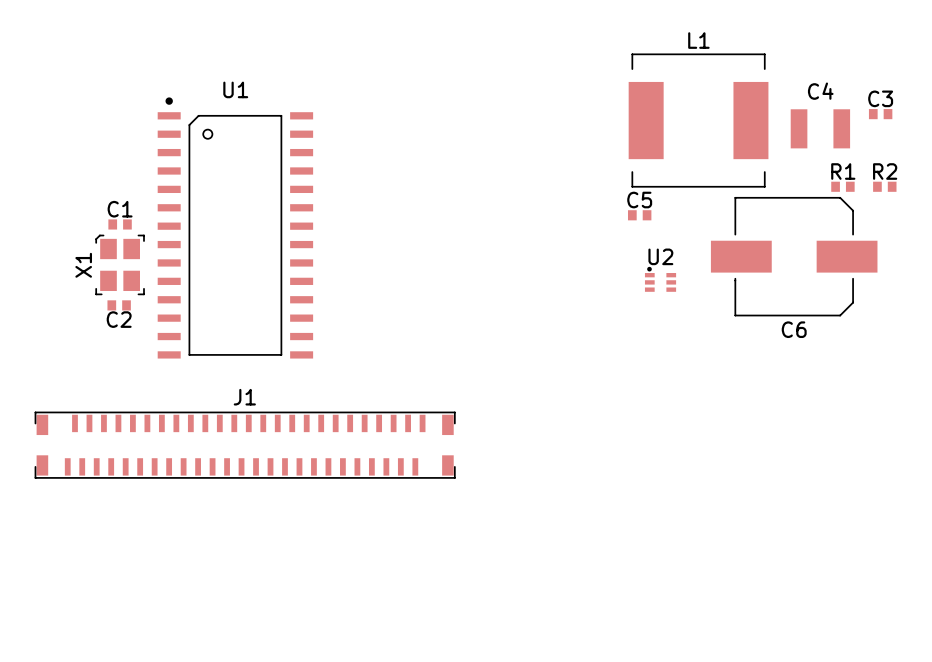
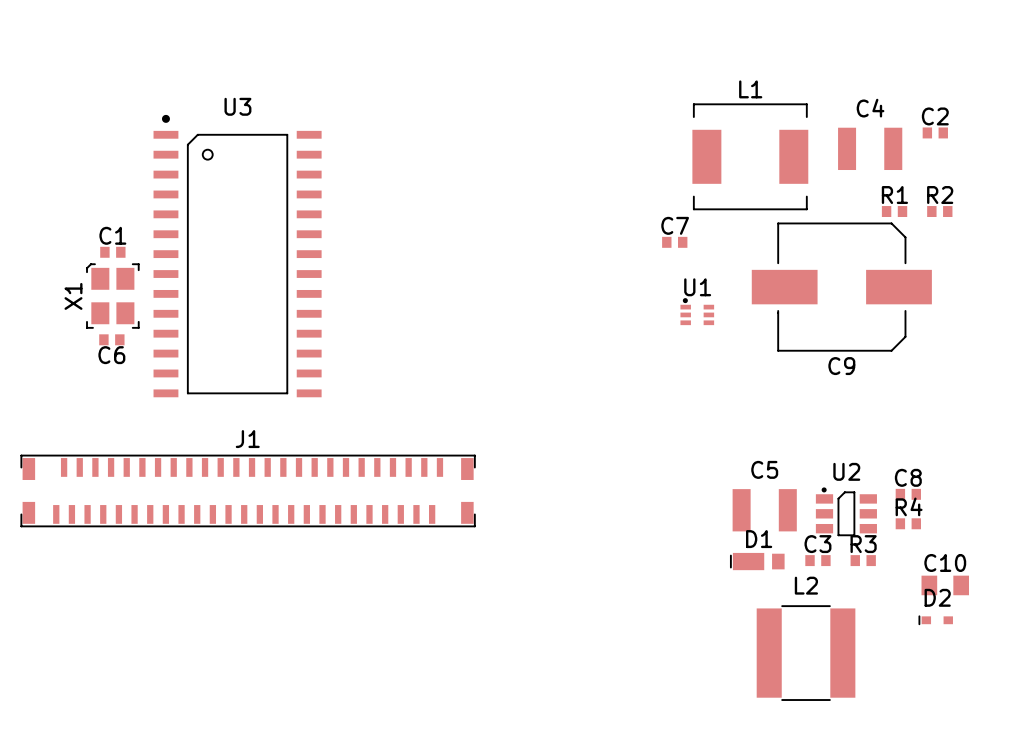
L1 footprint: [628, 53, 769, 188] -> [692, 103, 809, 211]
U1 name: U1 (235, 89) -> U3 (237, 106)
C3 name: C3 (880, 98) -> C2 (935, 116)
C5 name: C5 (639, 200) -> C7 (675, 225)
U2 name: U2 (660, 256) -> U1 (697, 287)
C2 name: C2 (119, 319) -> C6 (111, 355)
C6 name: C6 (794, 329) -> C9 (841, 366)
C8: none -> (908, 494)
C5: none -> (764, 510)
U2: none -> (846, 511)
R4: none -> (908, 523)
C3: none -> (817, 560)
R3: none -> (863, 560)
D1: none -> (757, 561)
C10: none -> (945, 585)
D2: none -> (935, 620)
L2: none -> (806, 653)

